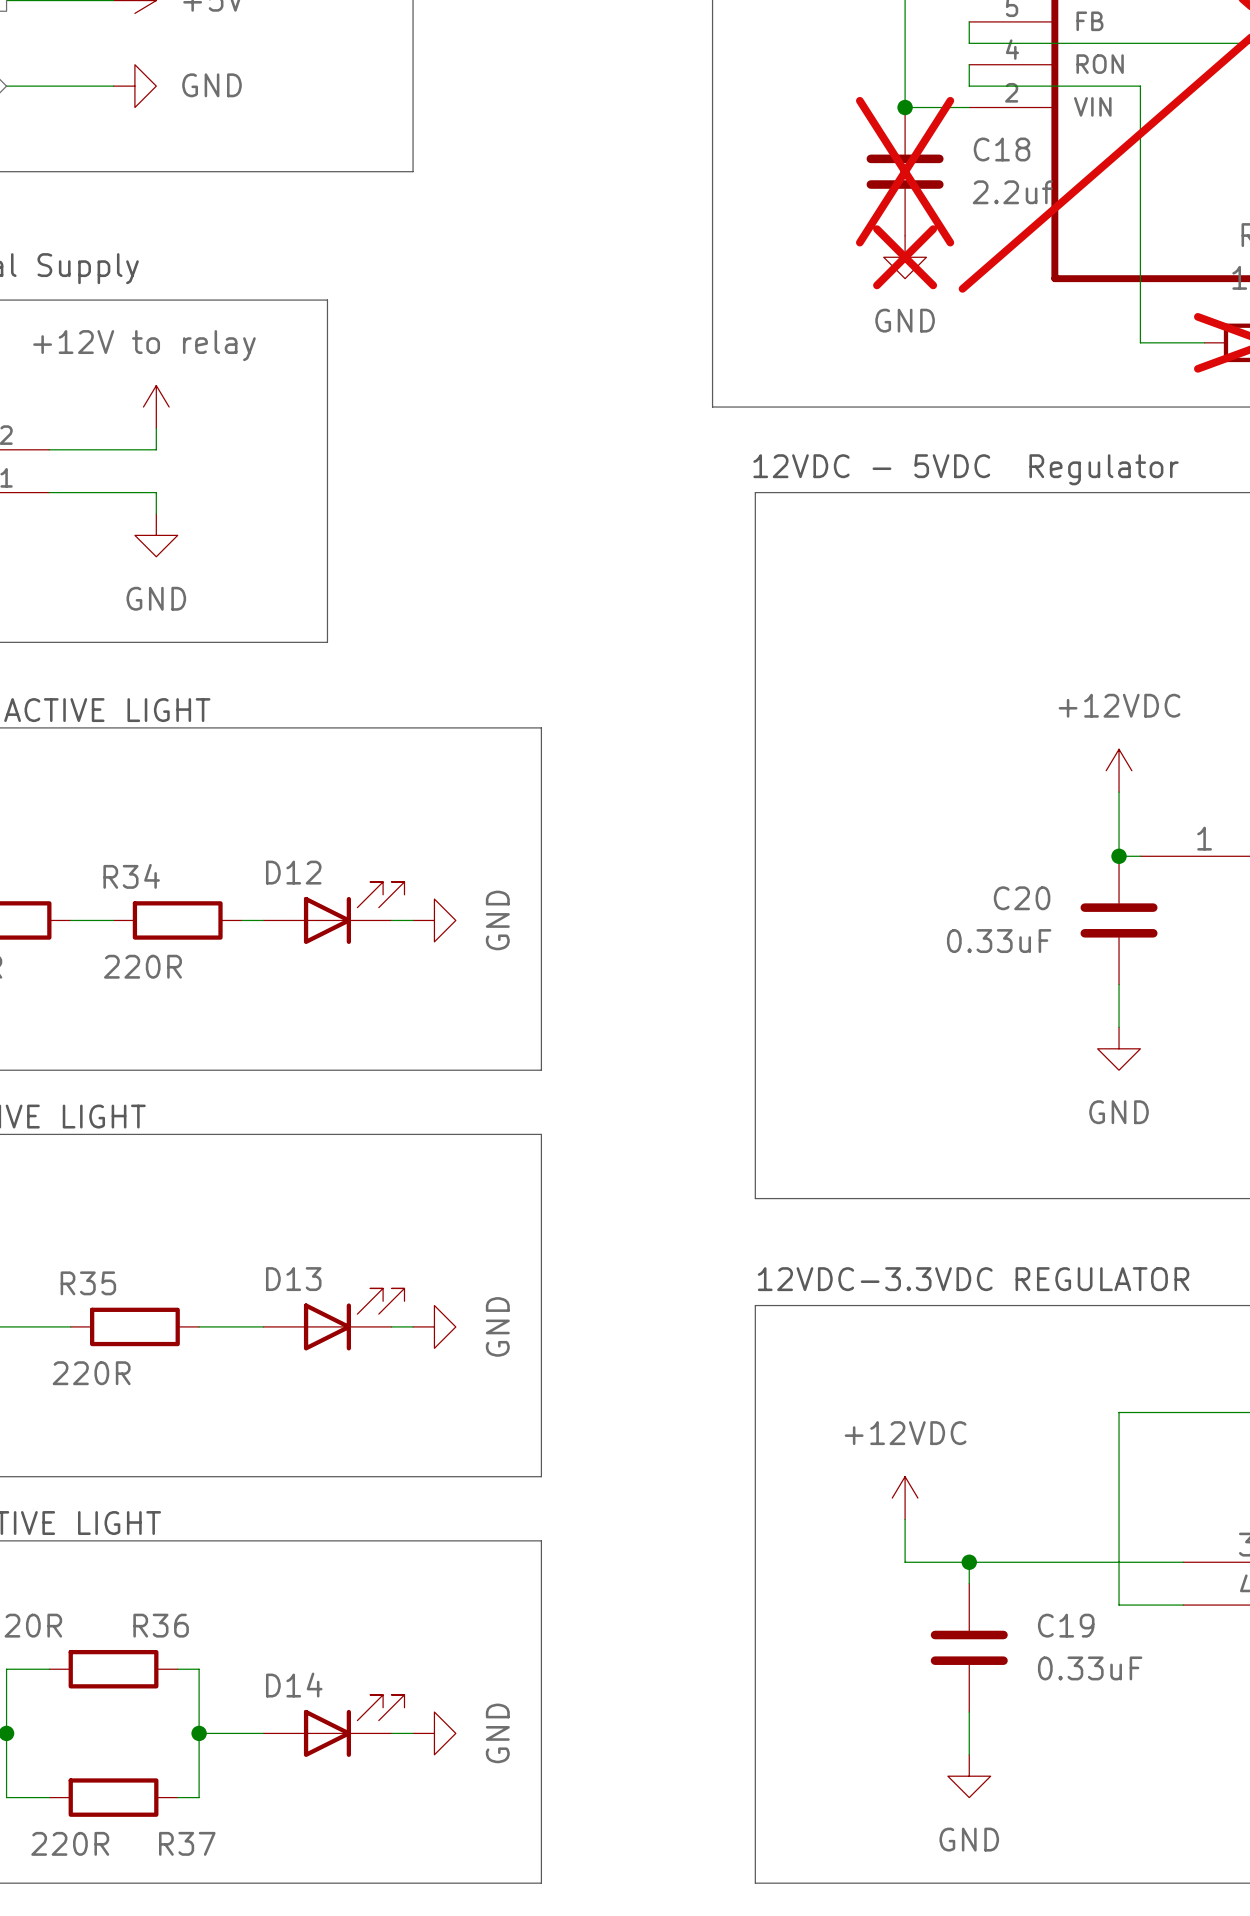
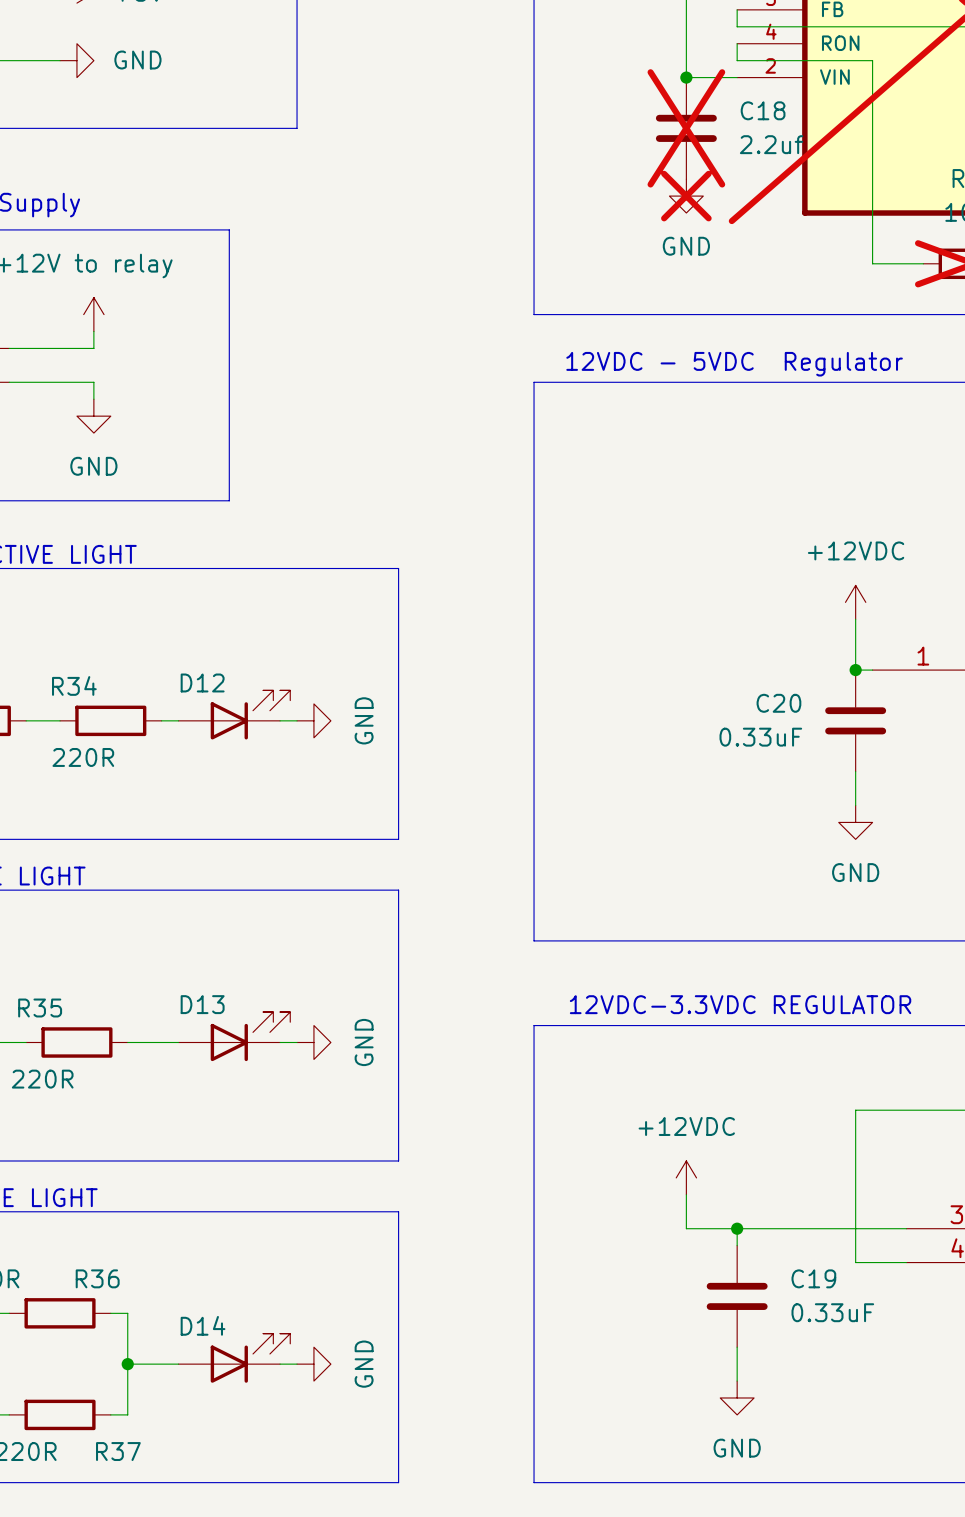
line: (755, 492) (755, 1198) -> (567, 382) (534, 382) (534, 940) (567, 940)
line: (755, 1305) (755, 1883) -> (567, 1025) (534, 1025) (534, 1482) (567, 1482)

